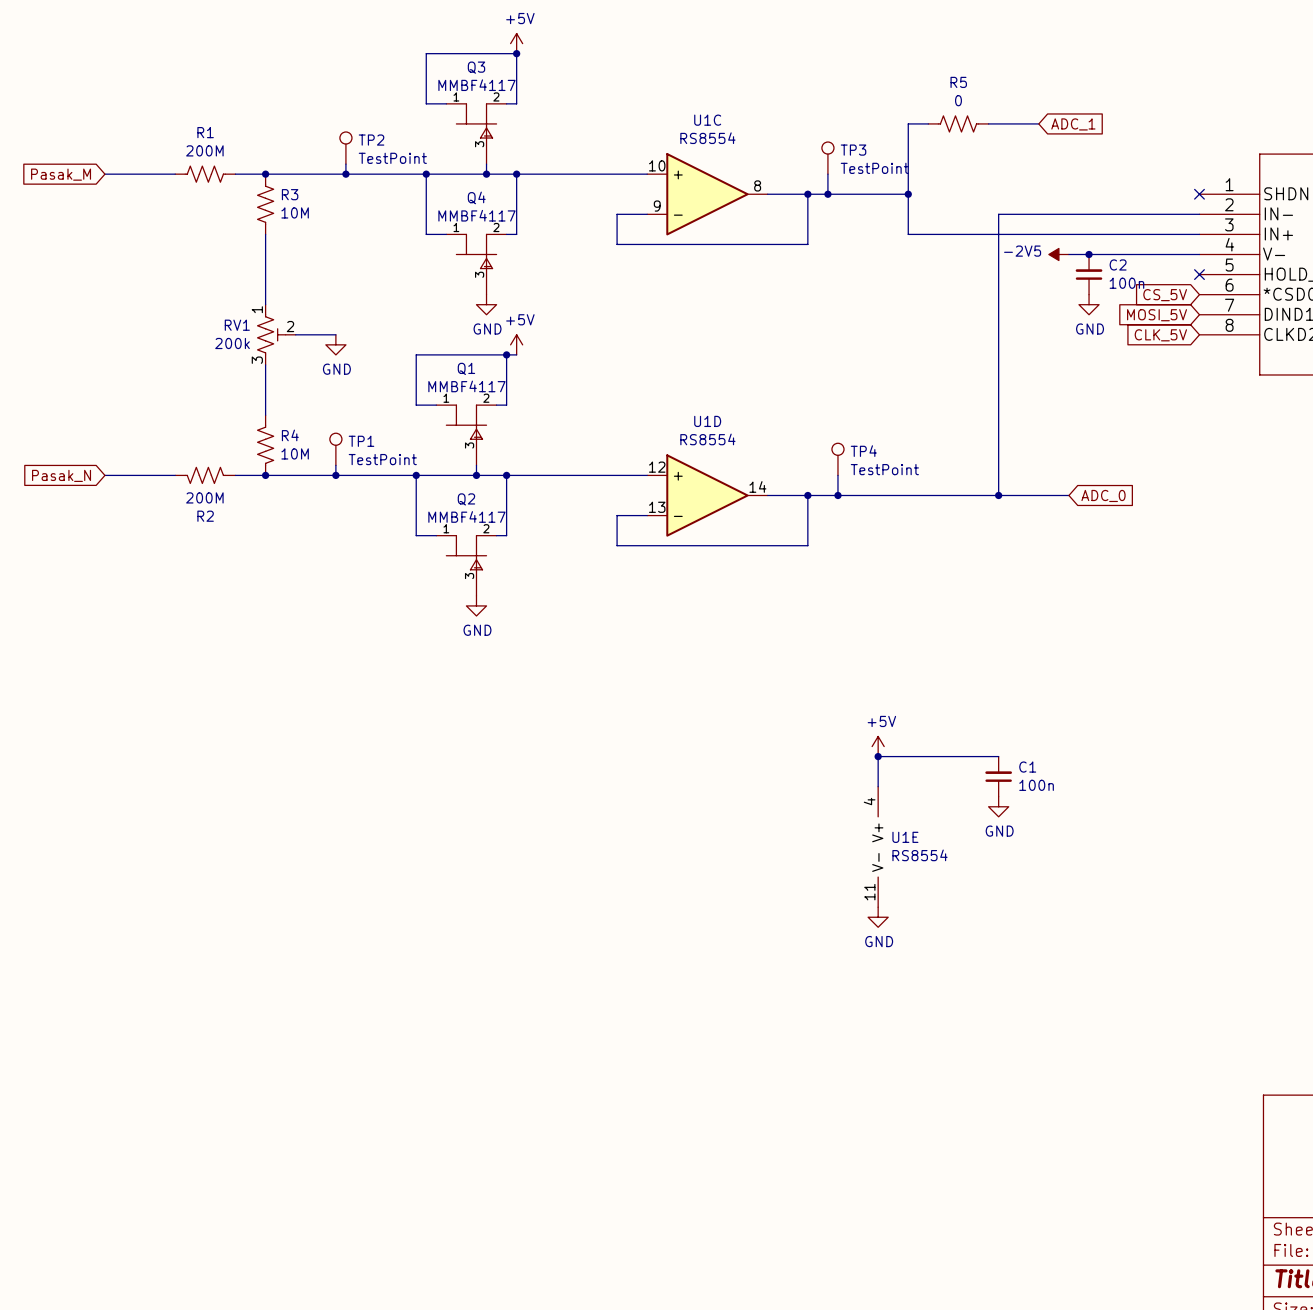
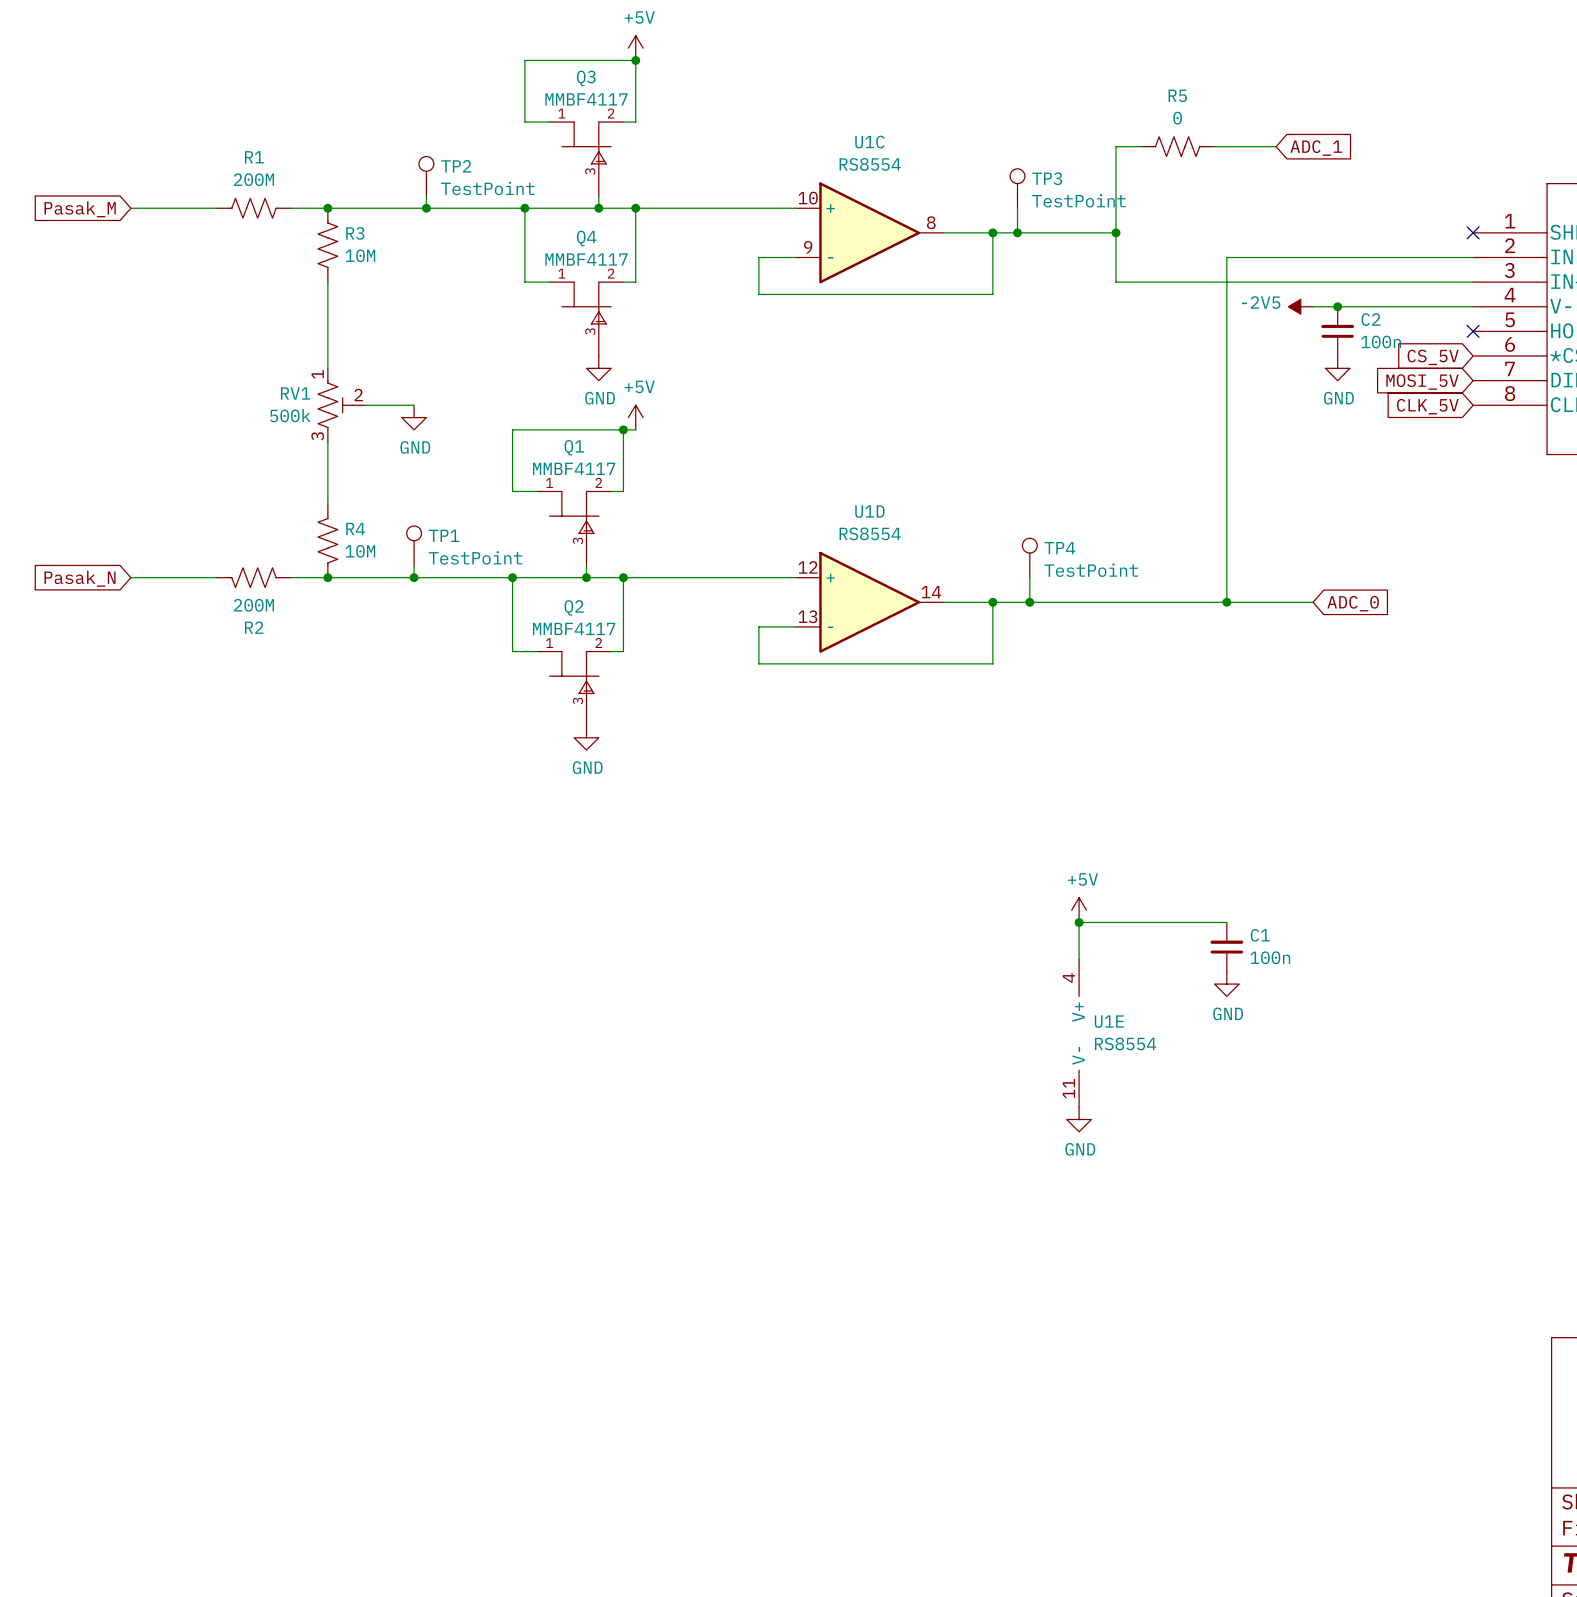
RV1 value: 200k (232, 343) -> 500k (290, 415)

